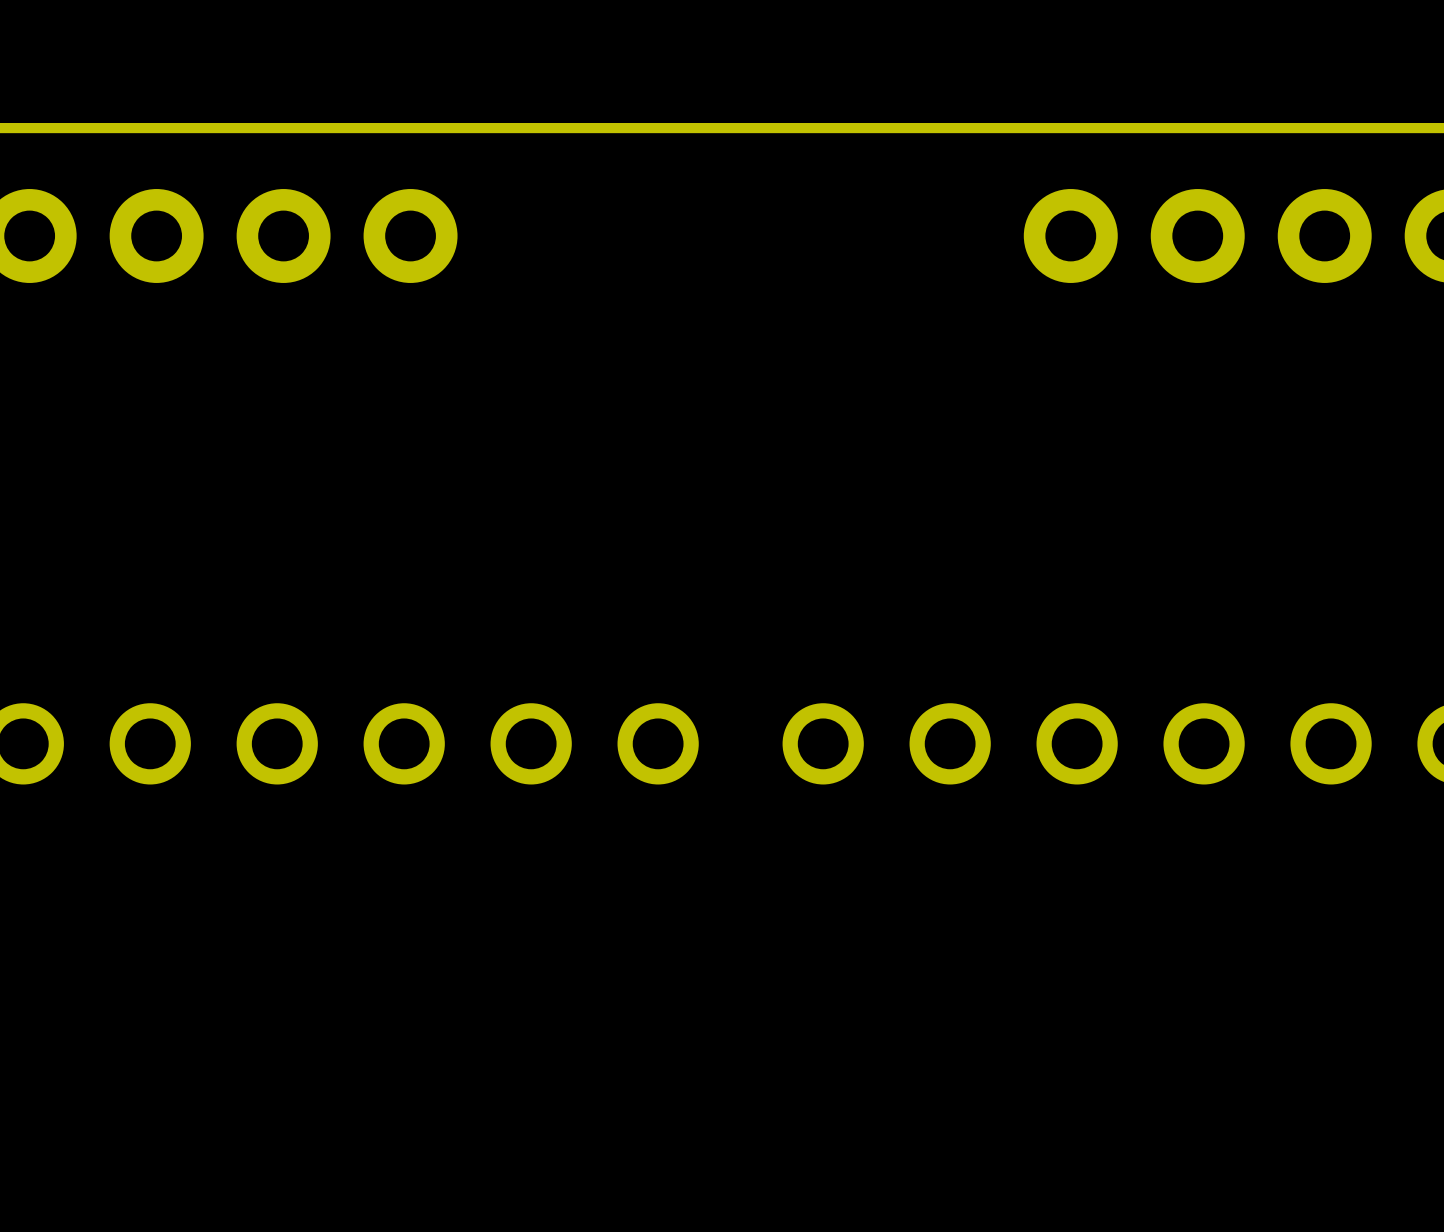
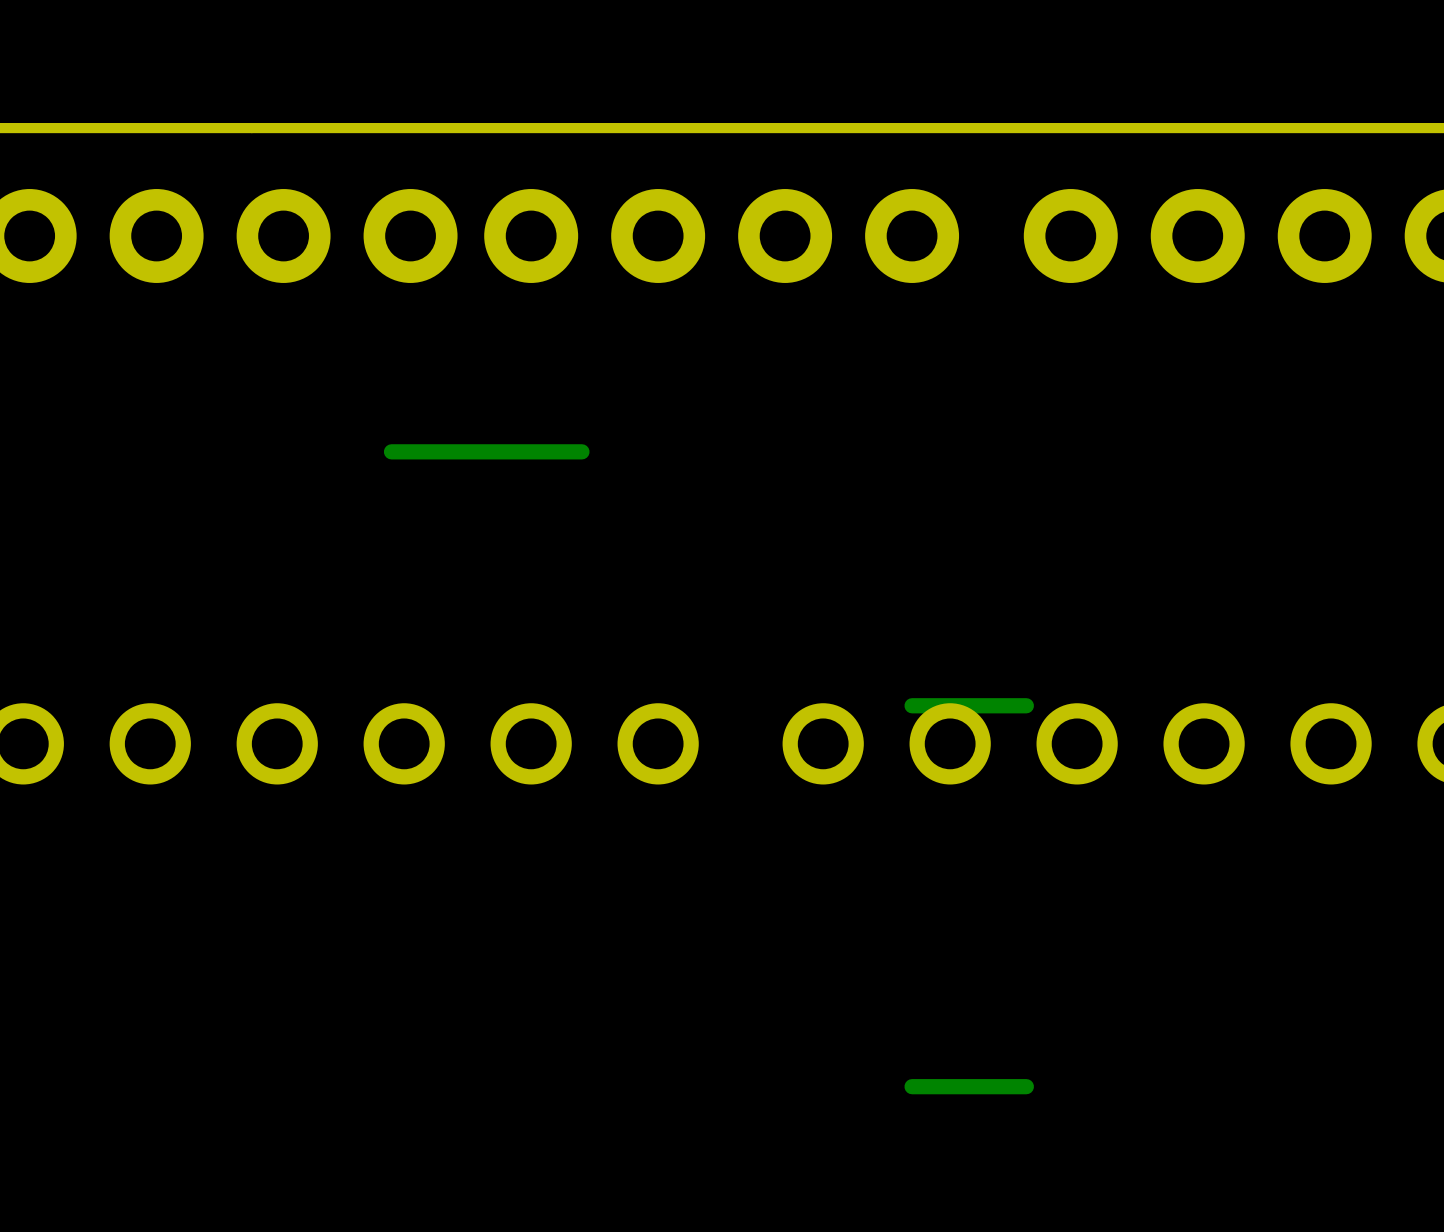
part: none -> (721, 235)
track: none -> (581, 451) (391, 451)
track: none -> (1026, 705) (912, 705)
track: none -> (1026, 1086) (912, 1086)

